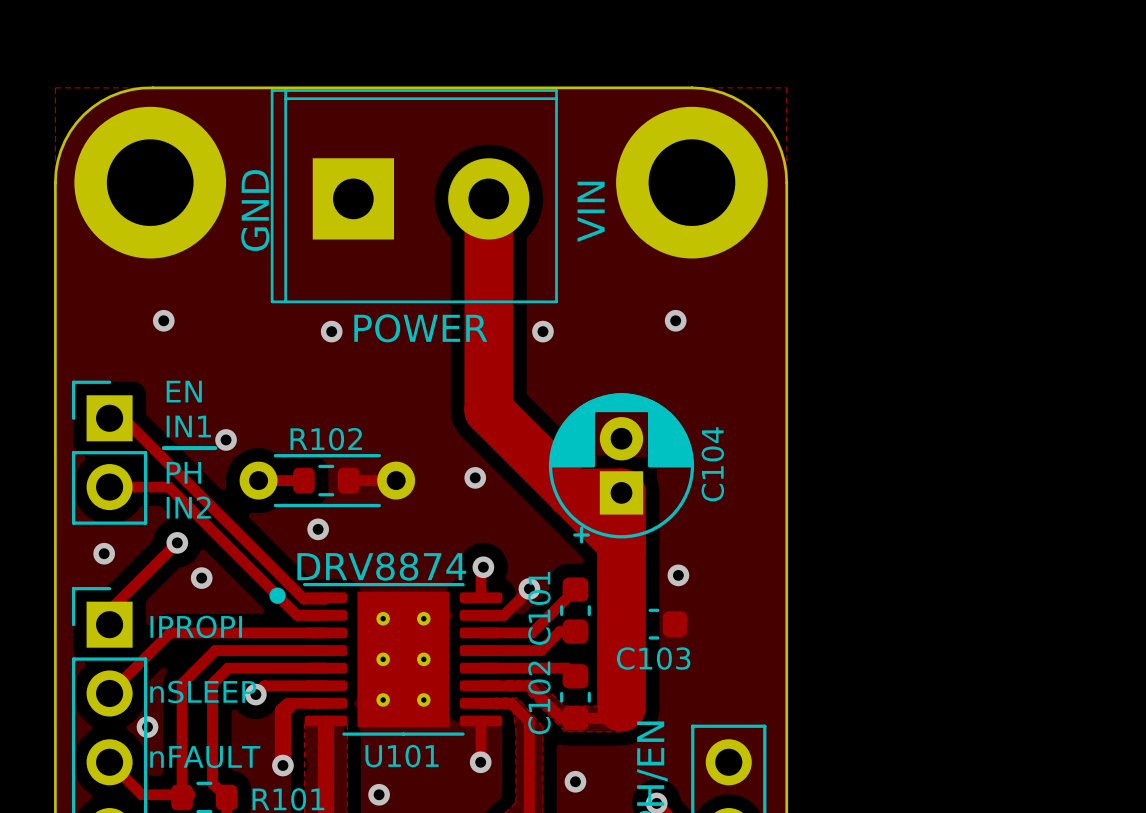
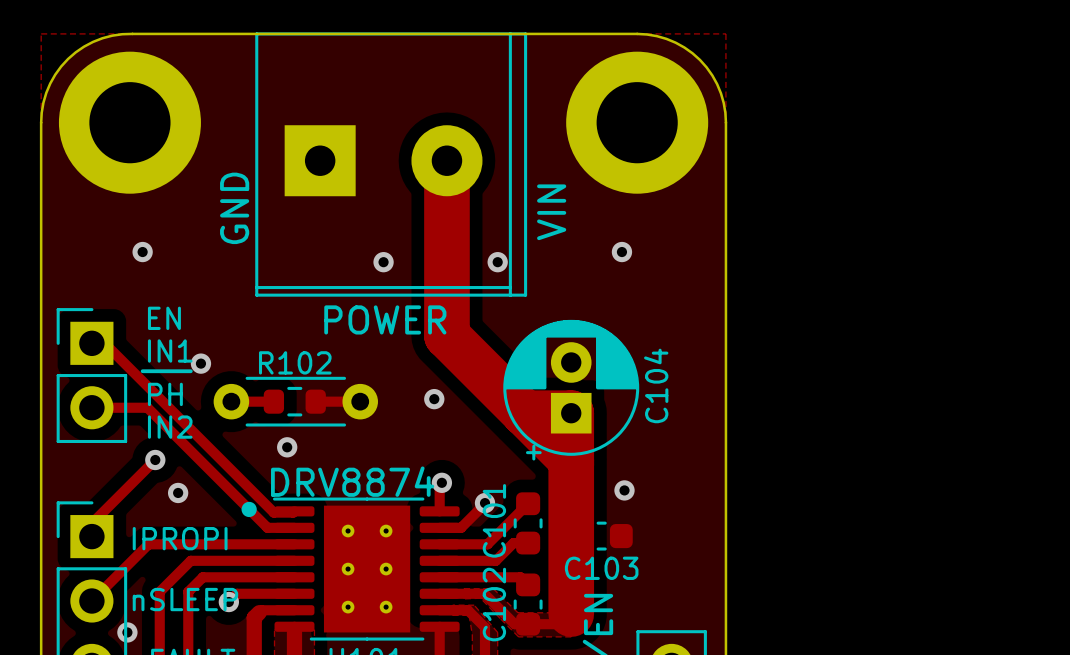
part: (414, 196) -> none
text position: GND (255, 210) -> GND (234, 208)
text position: VIN (591, 211) -> VIN (551, 212)
part: none -> (391, 164)
text position: POWER (420, 328) -> POWER (385, 319)
via position: (331, 331) -> (383, 262)
via: (104, 553) -> none

